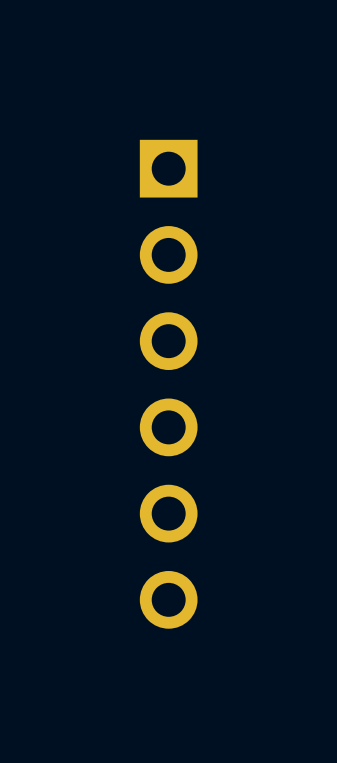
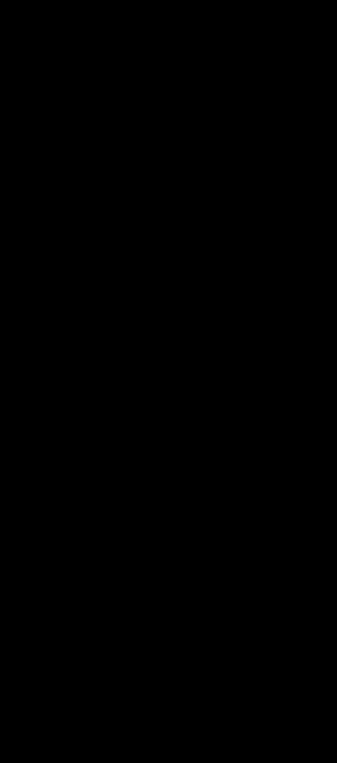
part: (168, 384) -> none

